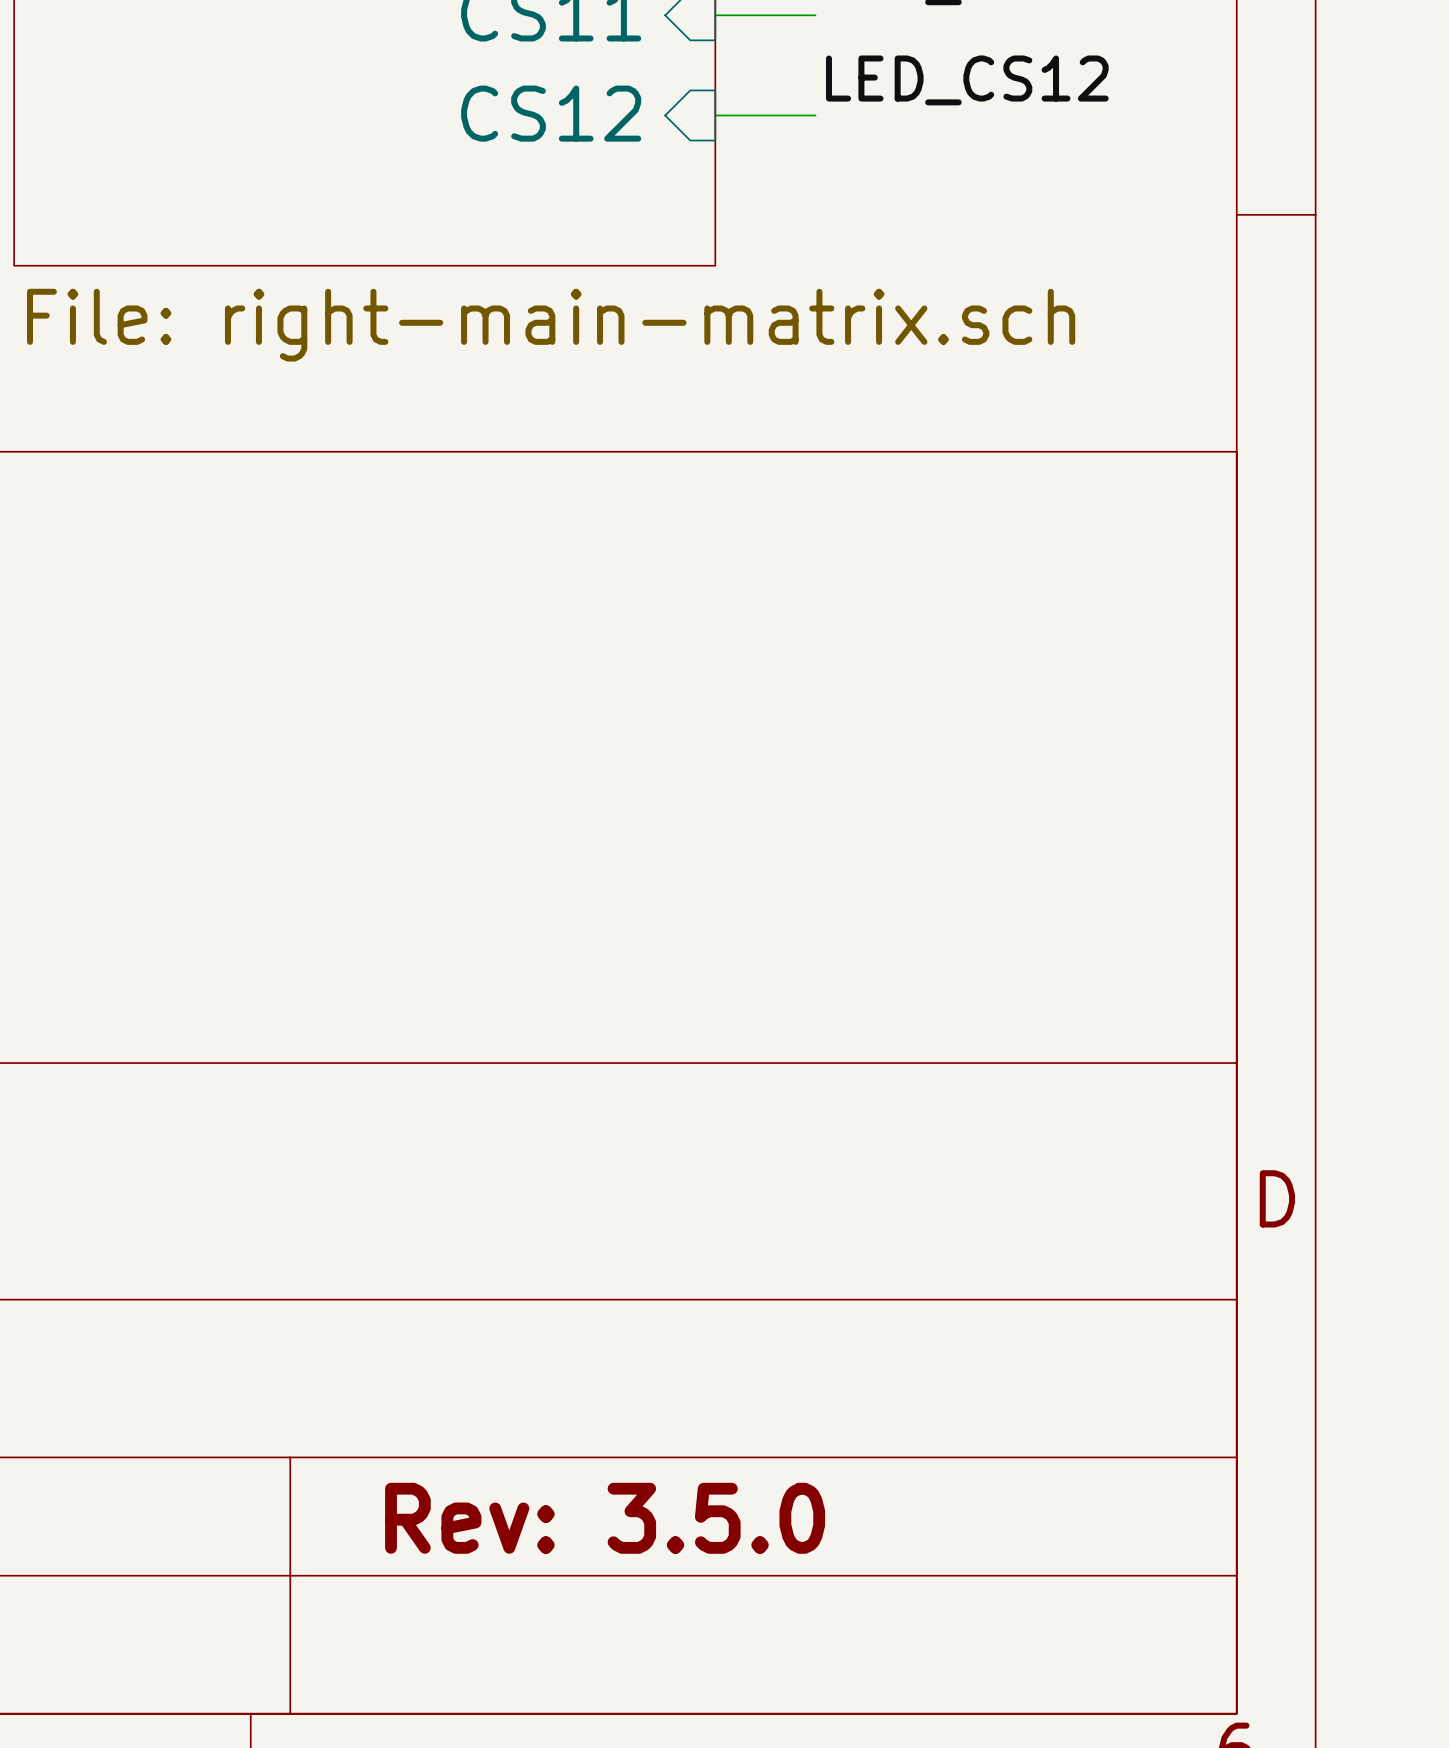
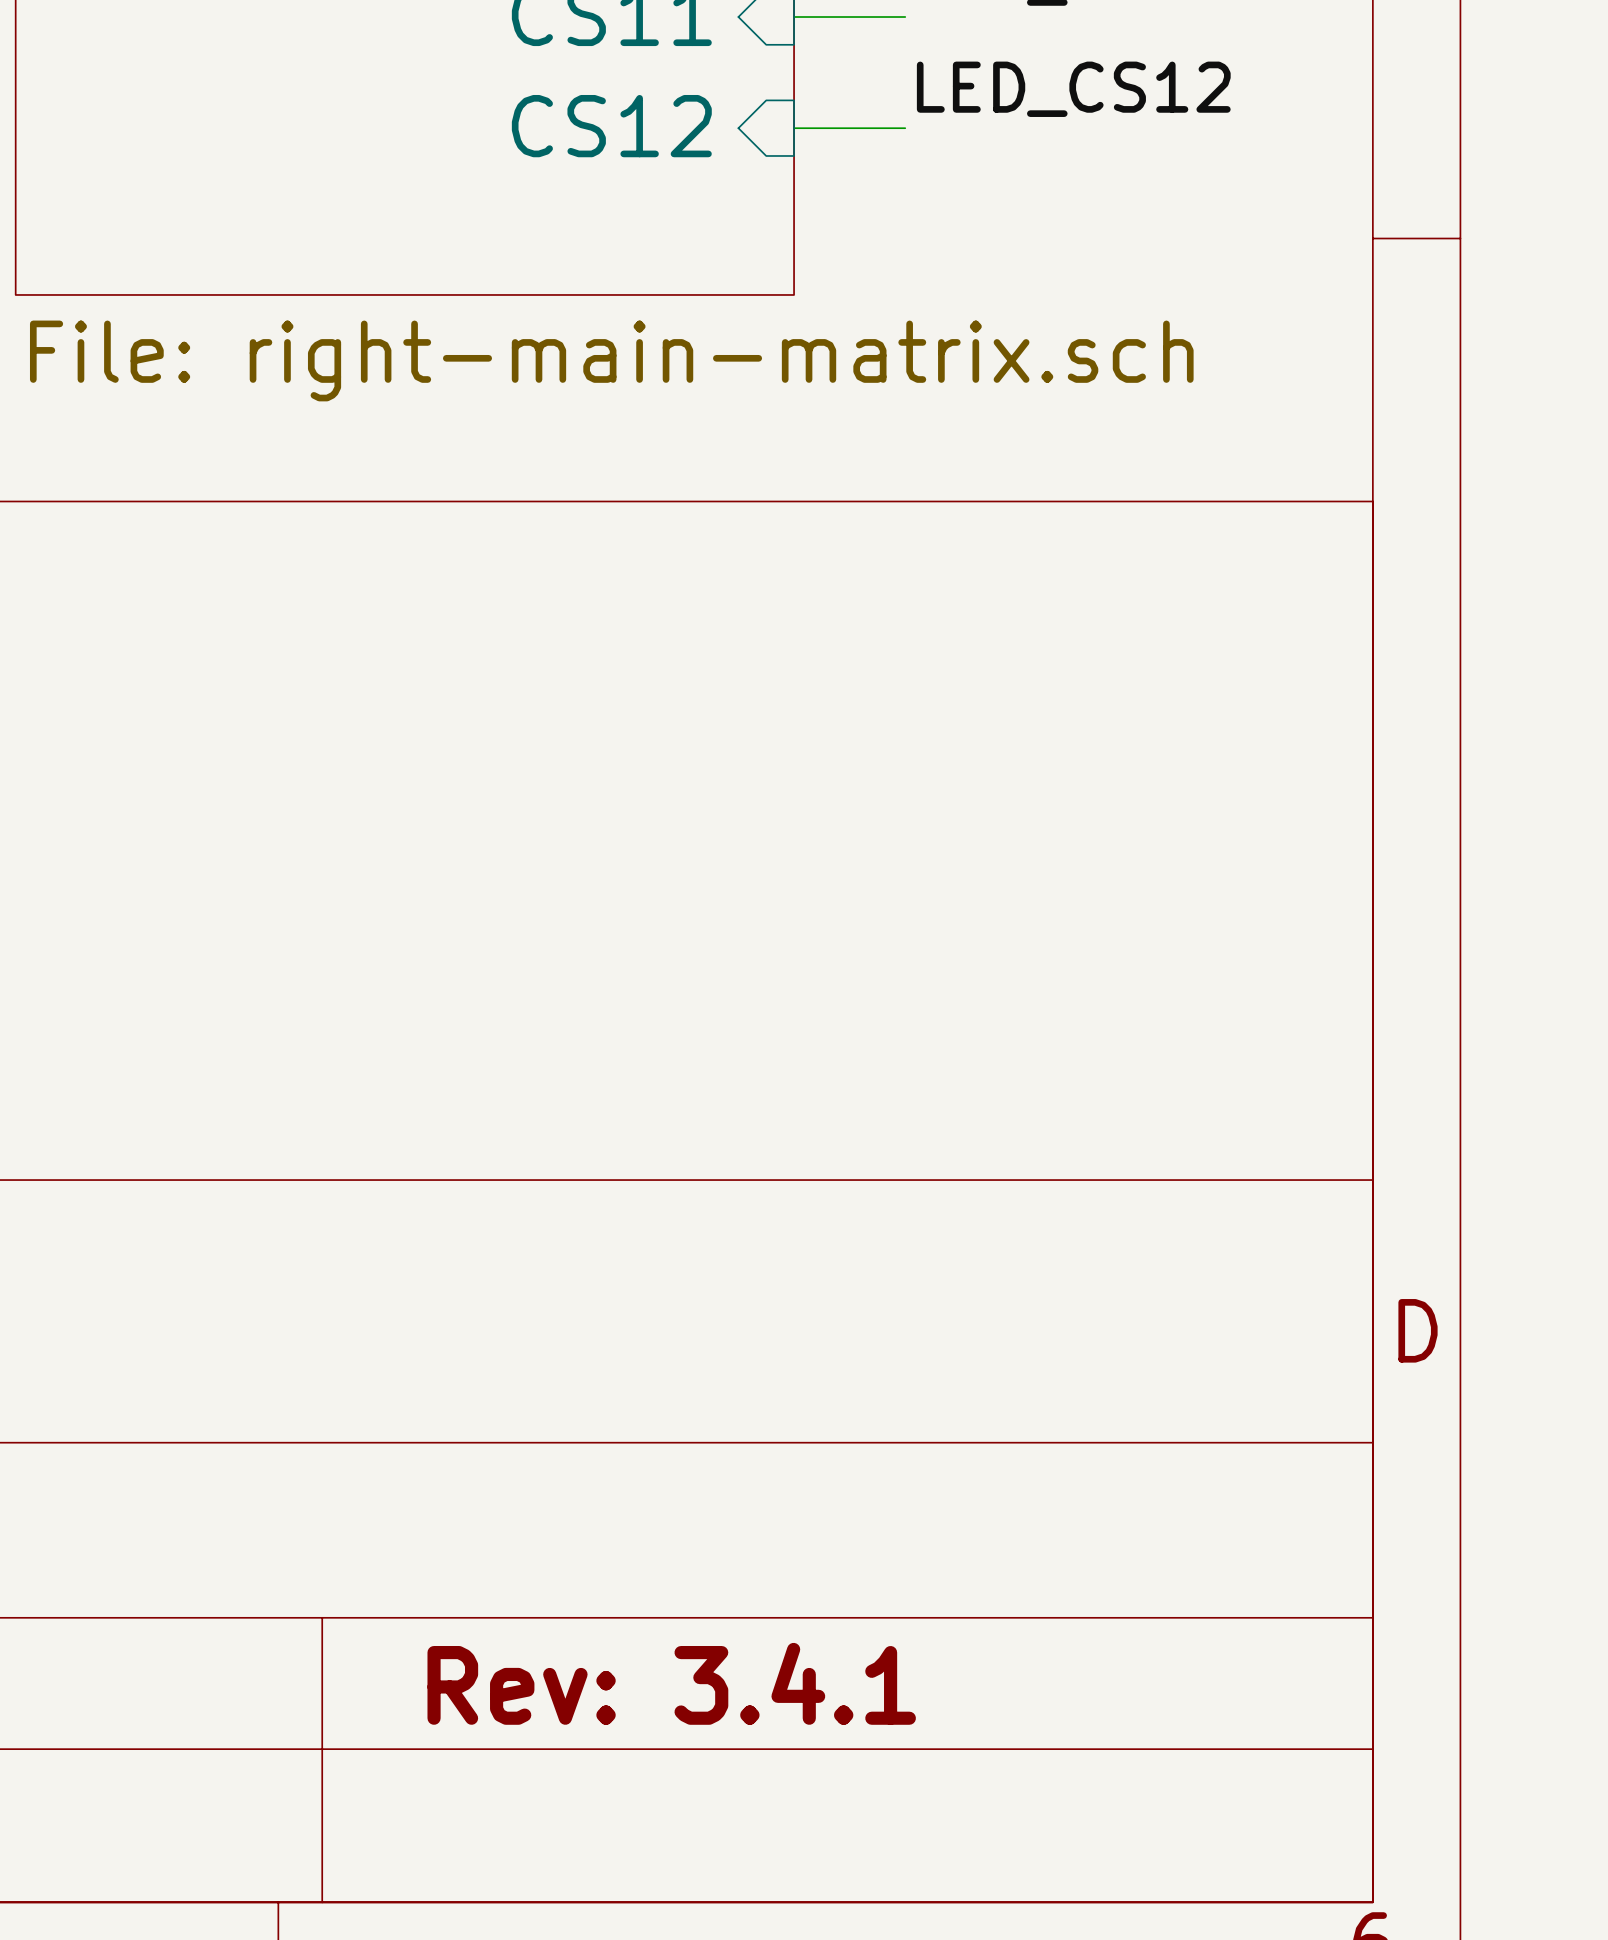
title block: Rev: 3.5.0 (605, 1518) -> Rev: 3.4.1 (671, 1683)

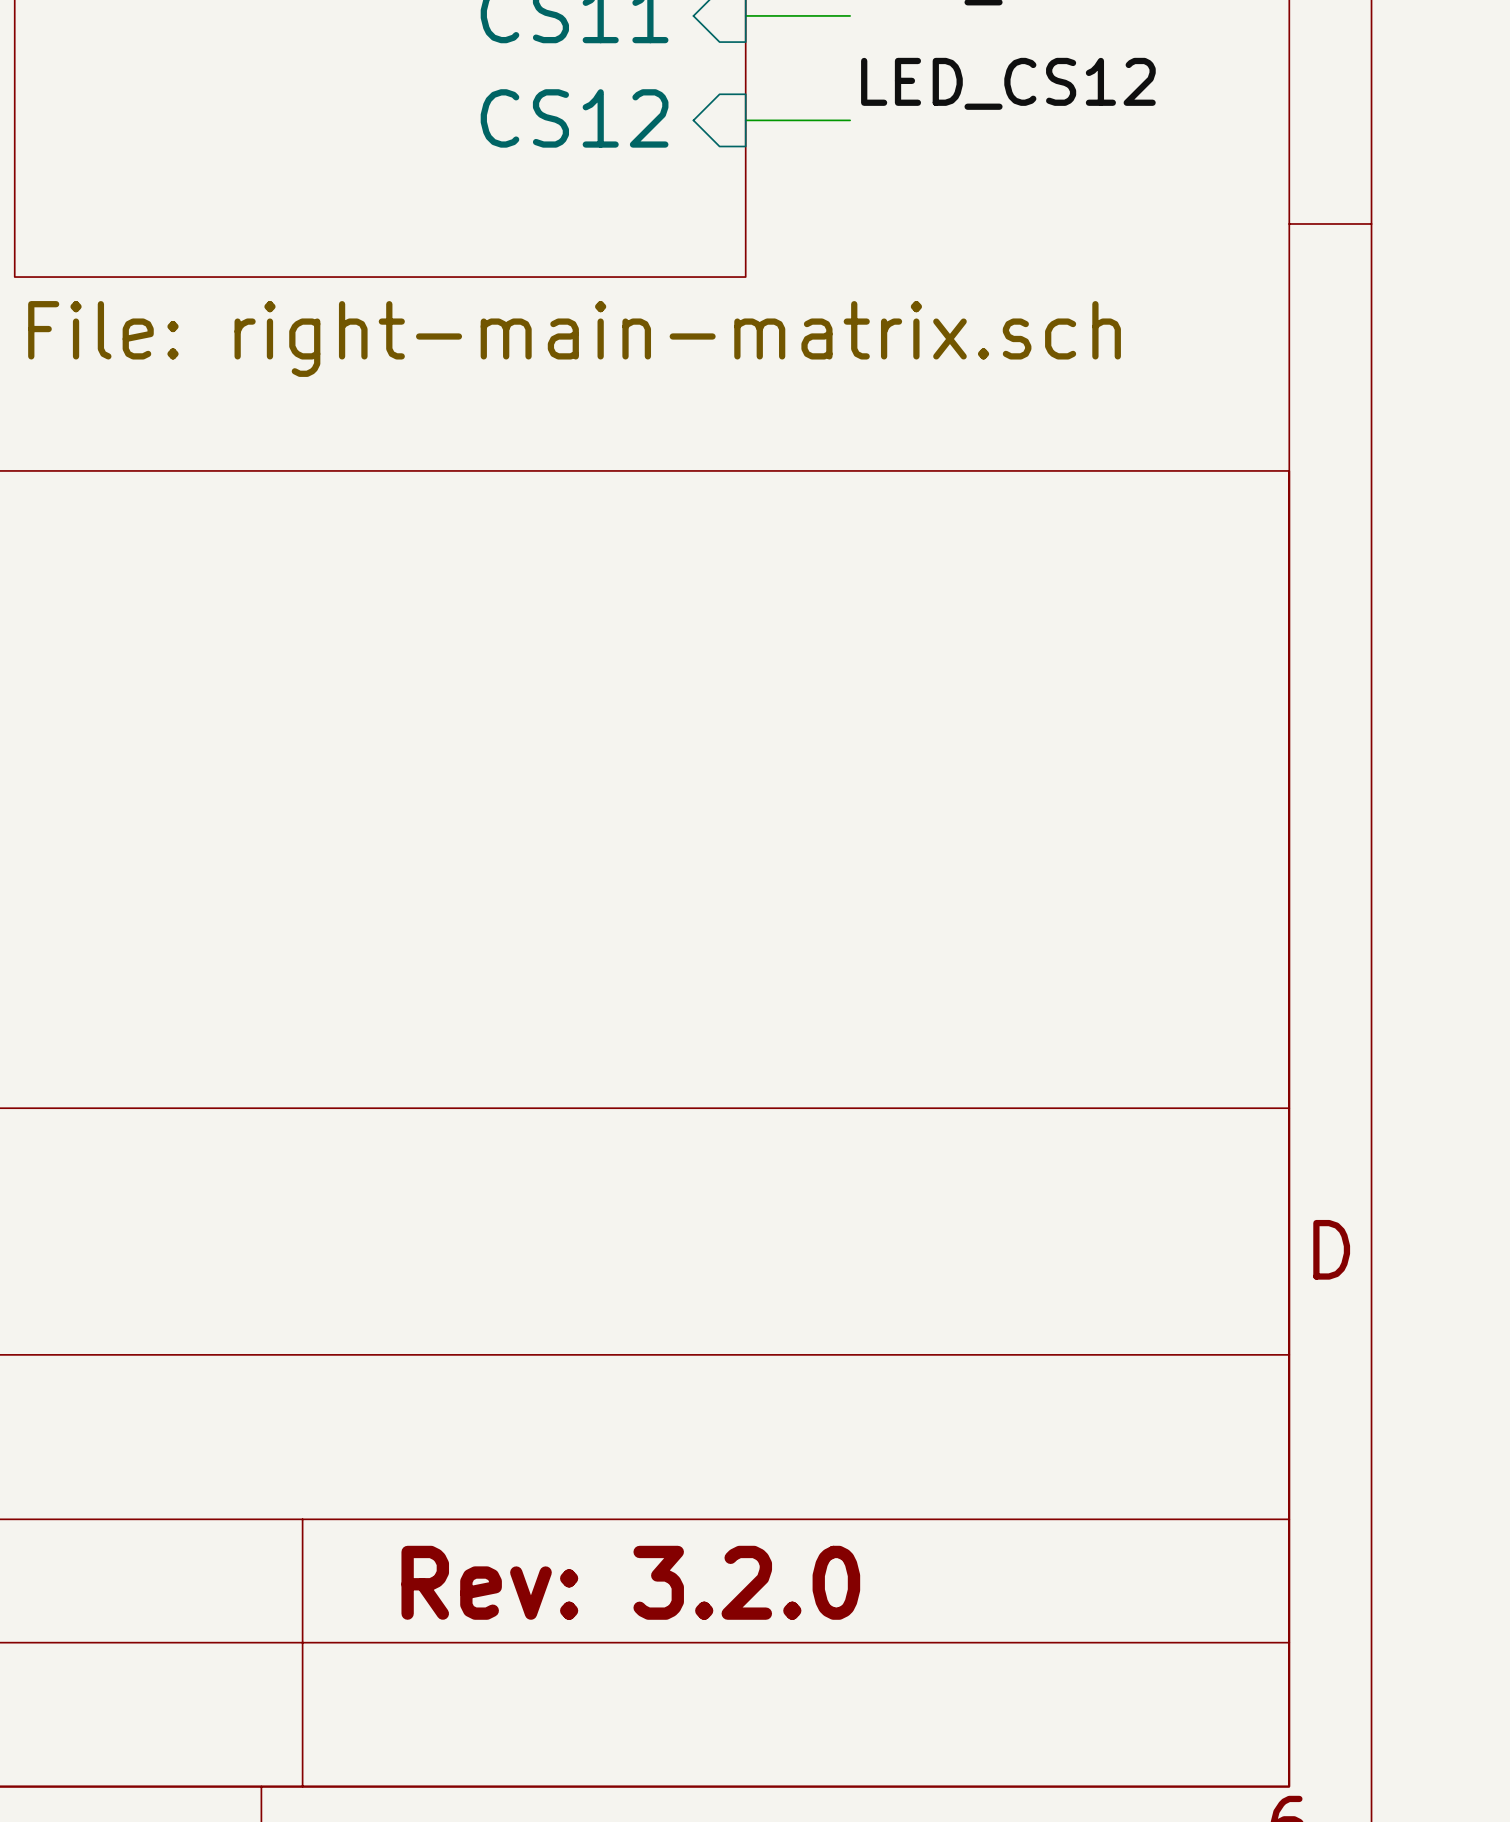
title block: Rev: 3.4.1 (671, 1683) -> Rev: 3.2.0 (630, 1582)

